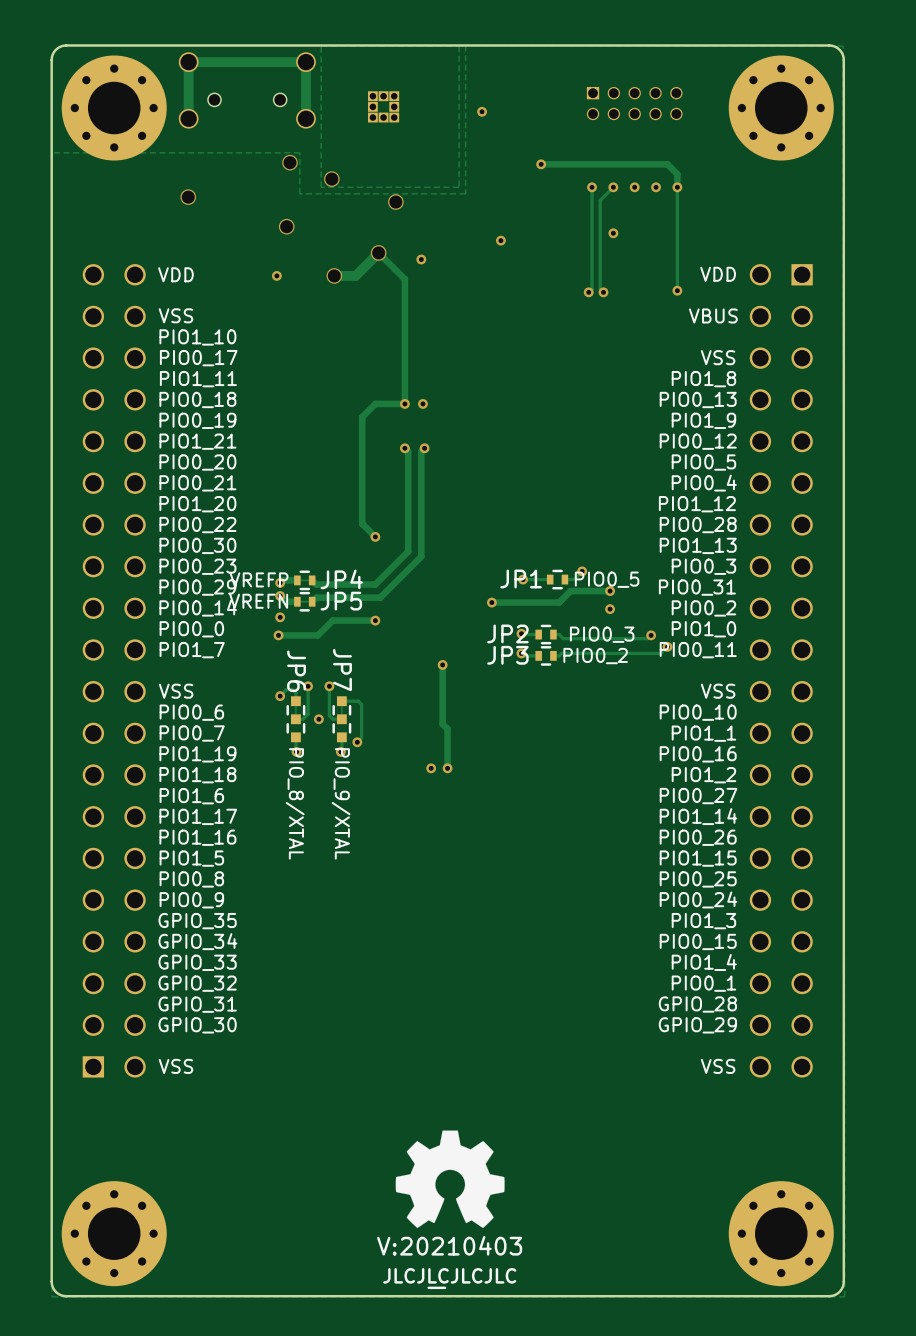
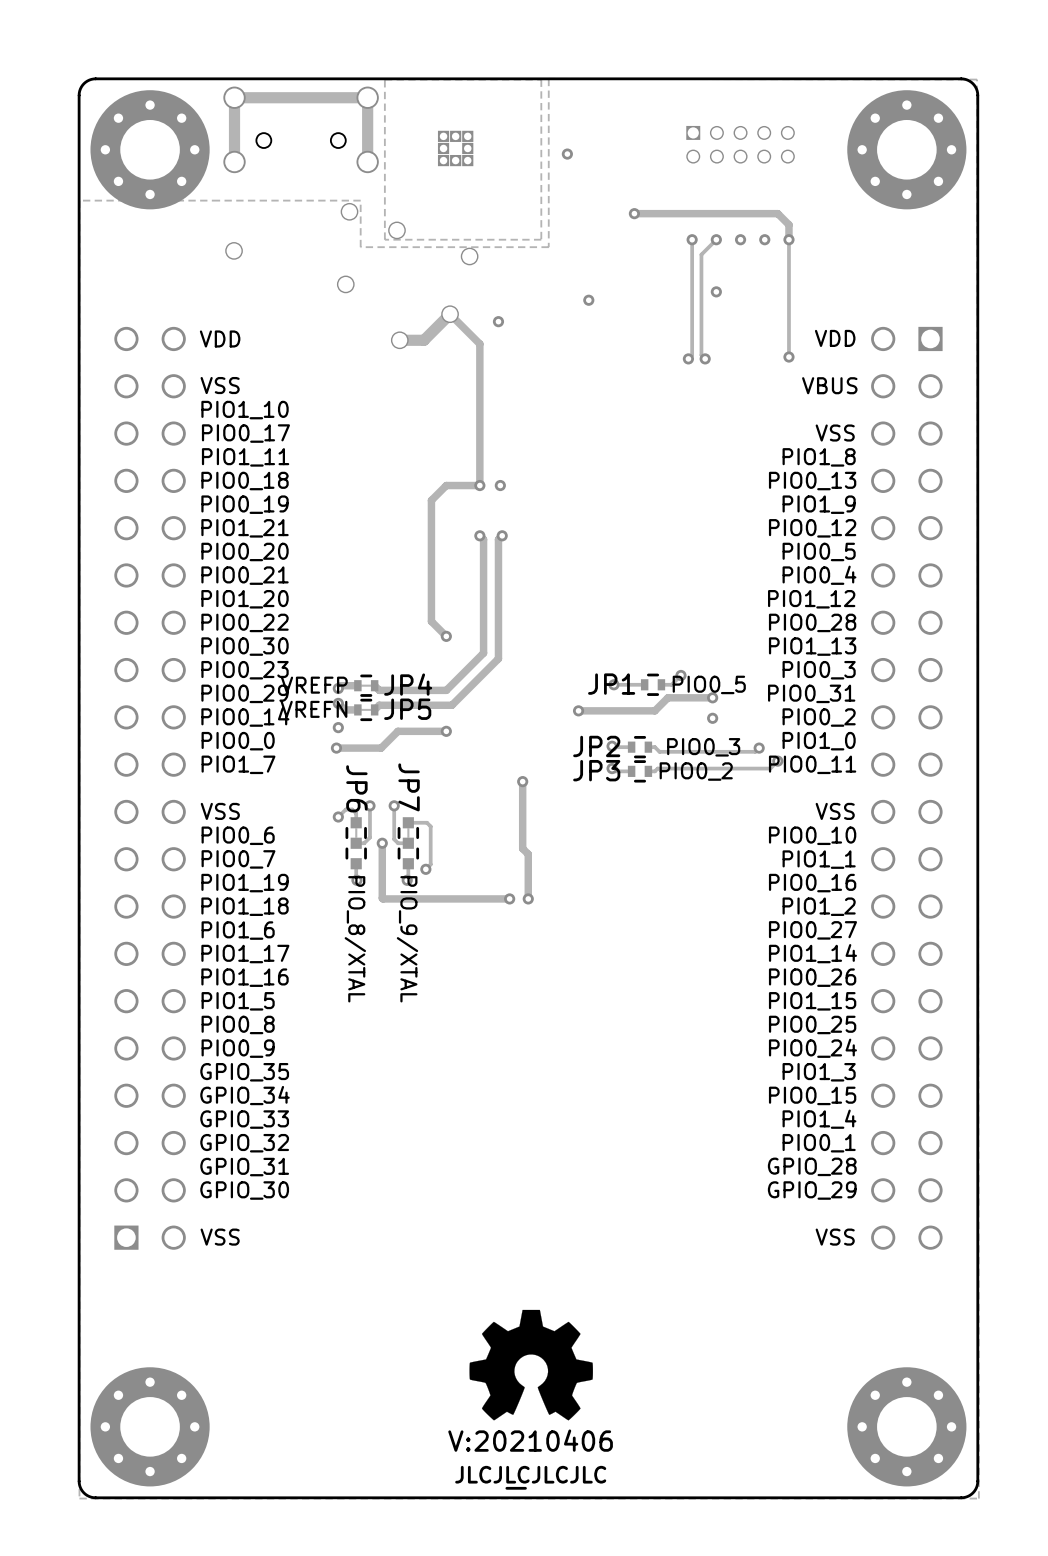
via: (276, 275) -> none
track: none -> (382, 843) (383, 898) (509, 898)
drawing shape: [377, 1235, 523, 1256] -> [448, 1429, 613, 1452]

